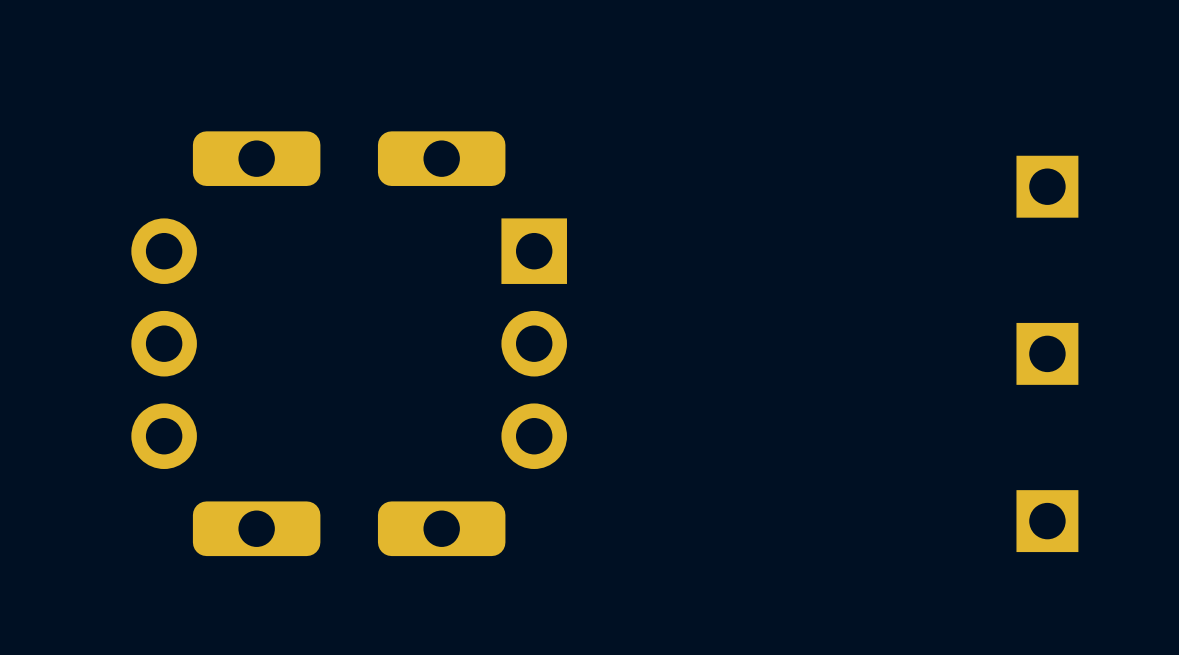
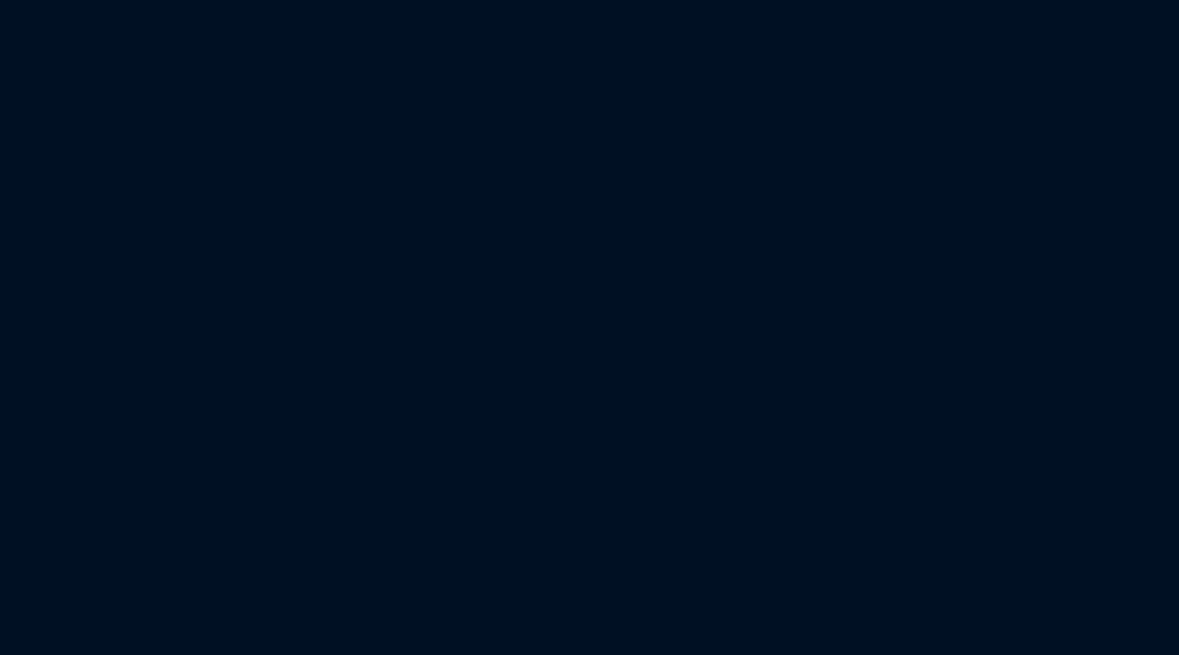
part: (1047, 186) -> none
part: (349, 343) -> none
part: (1047, 353) -> none
part: (1047, 521) -> none

